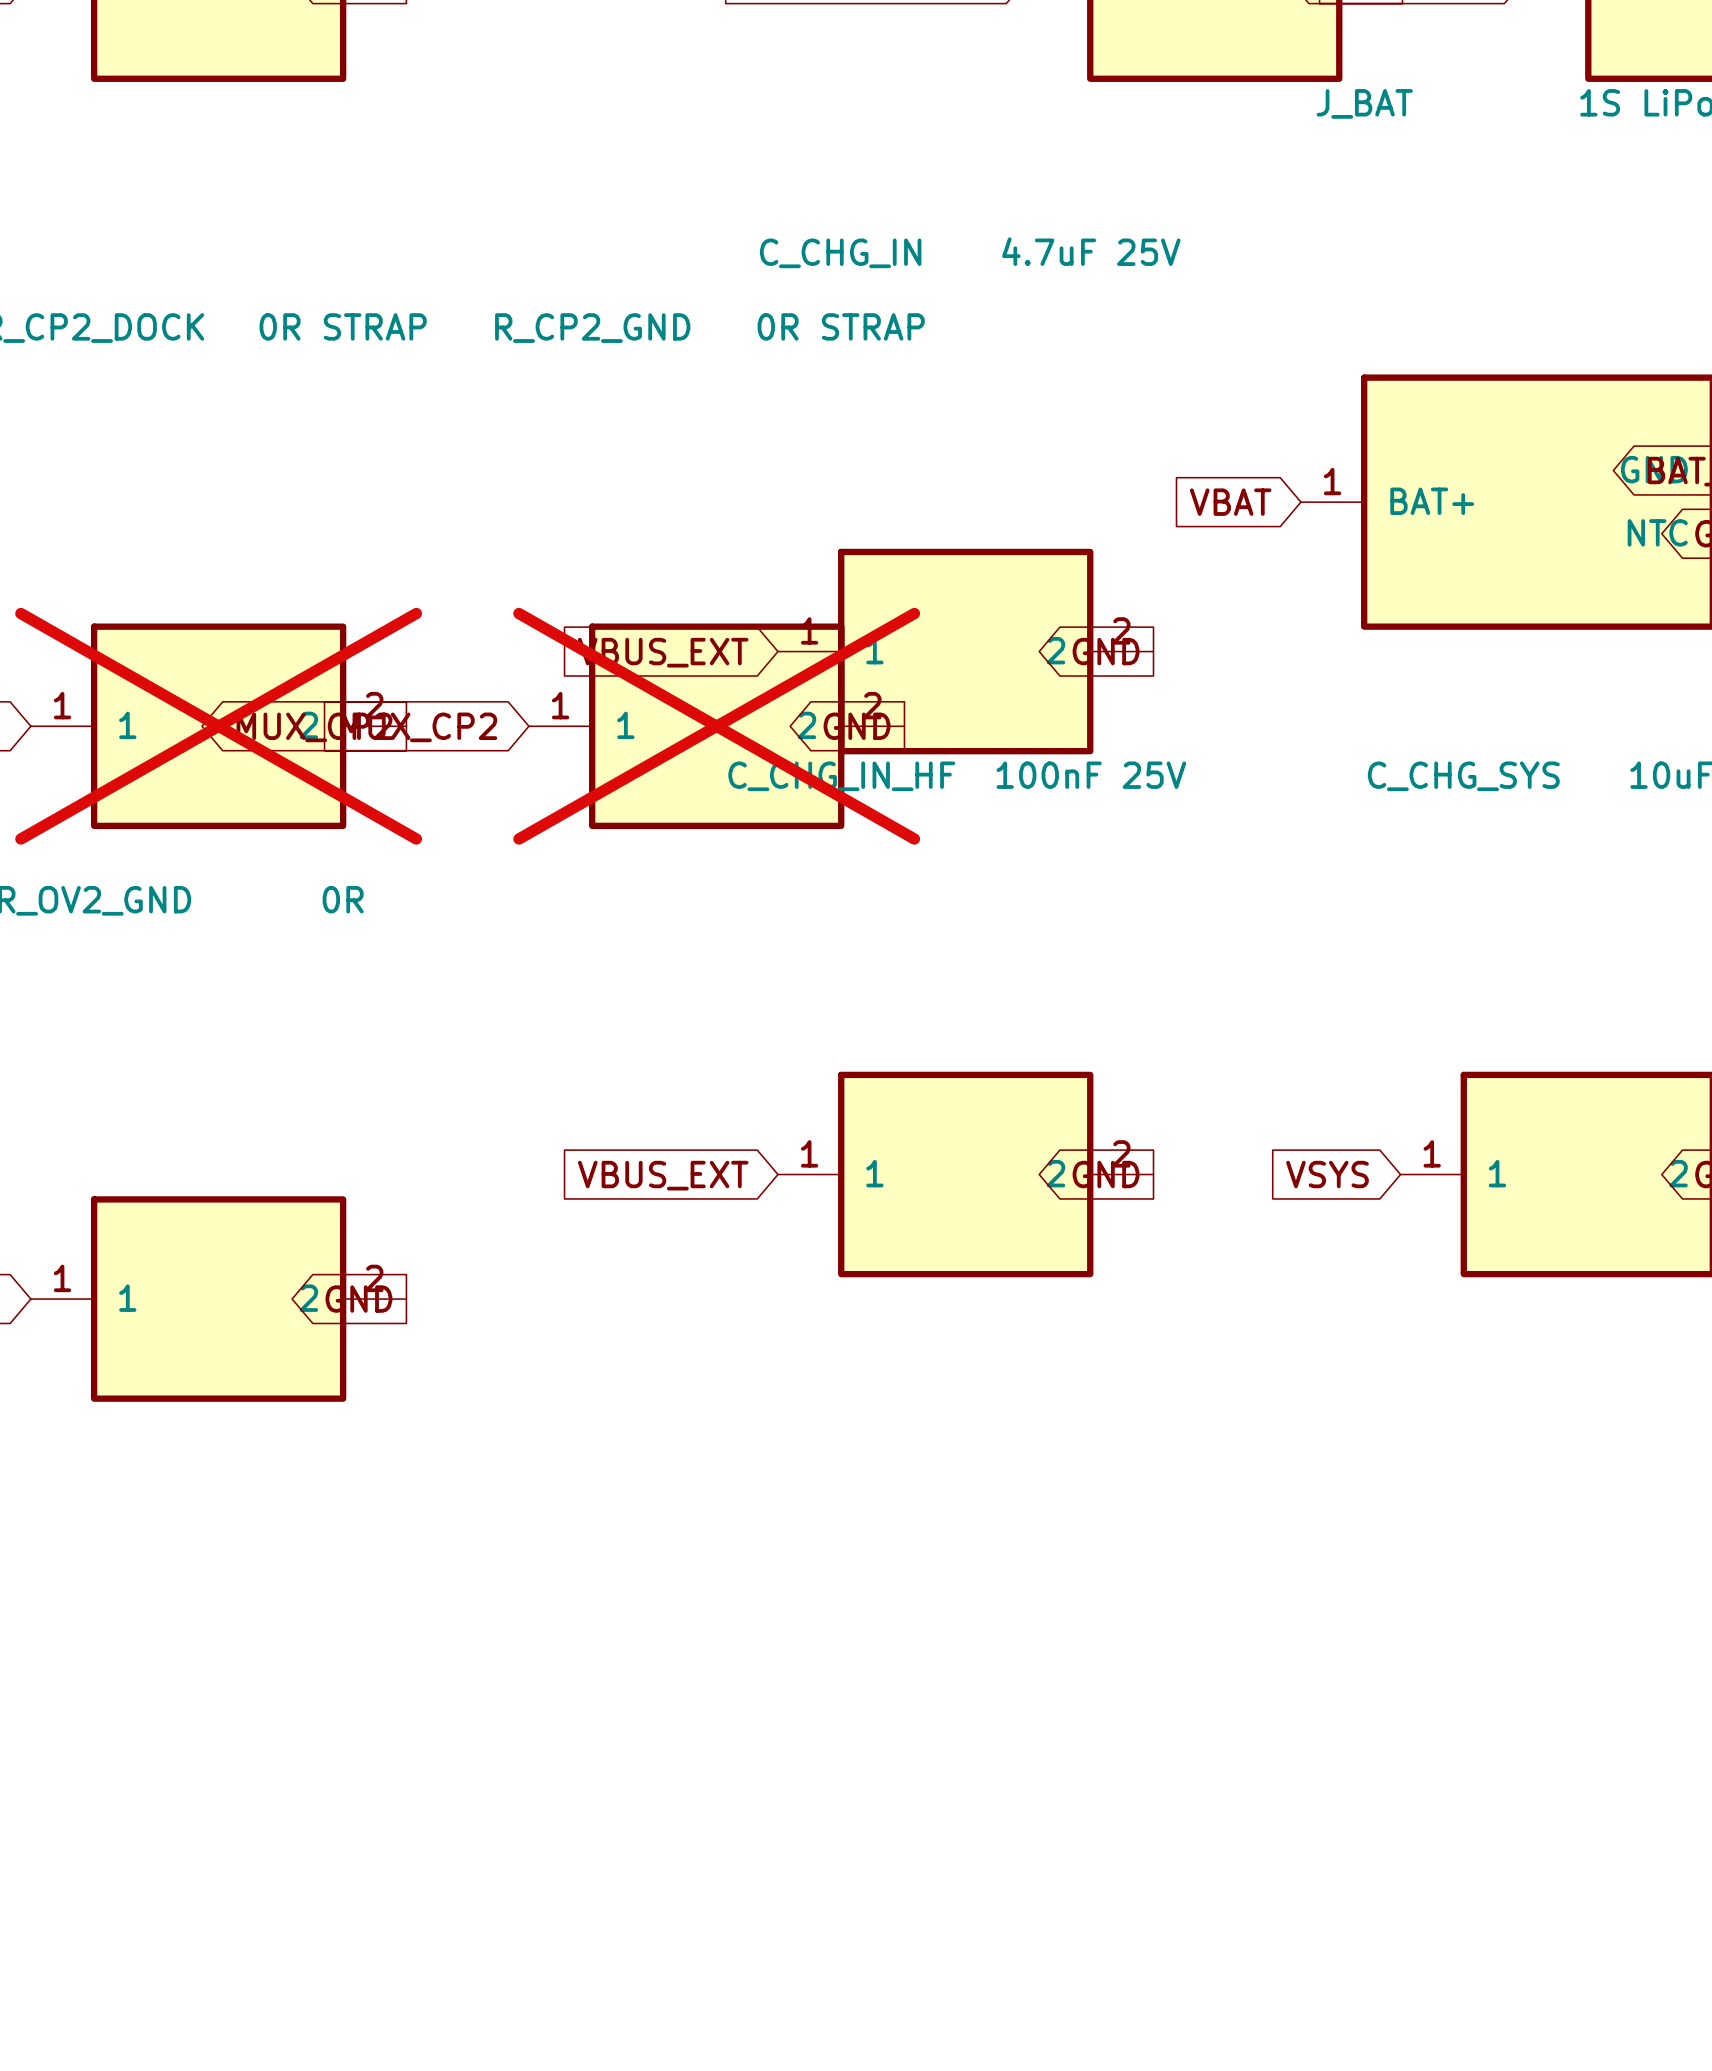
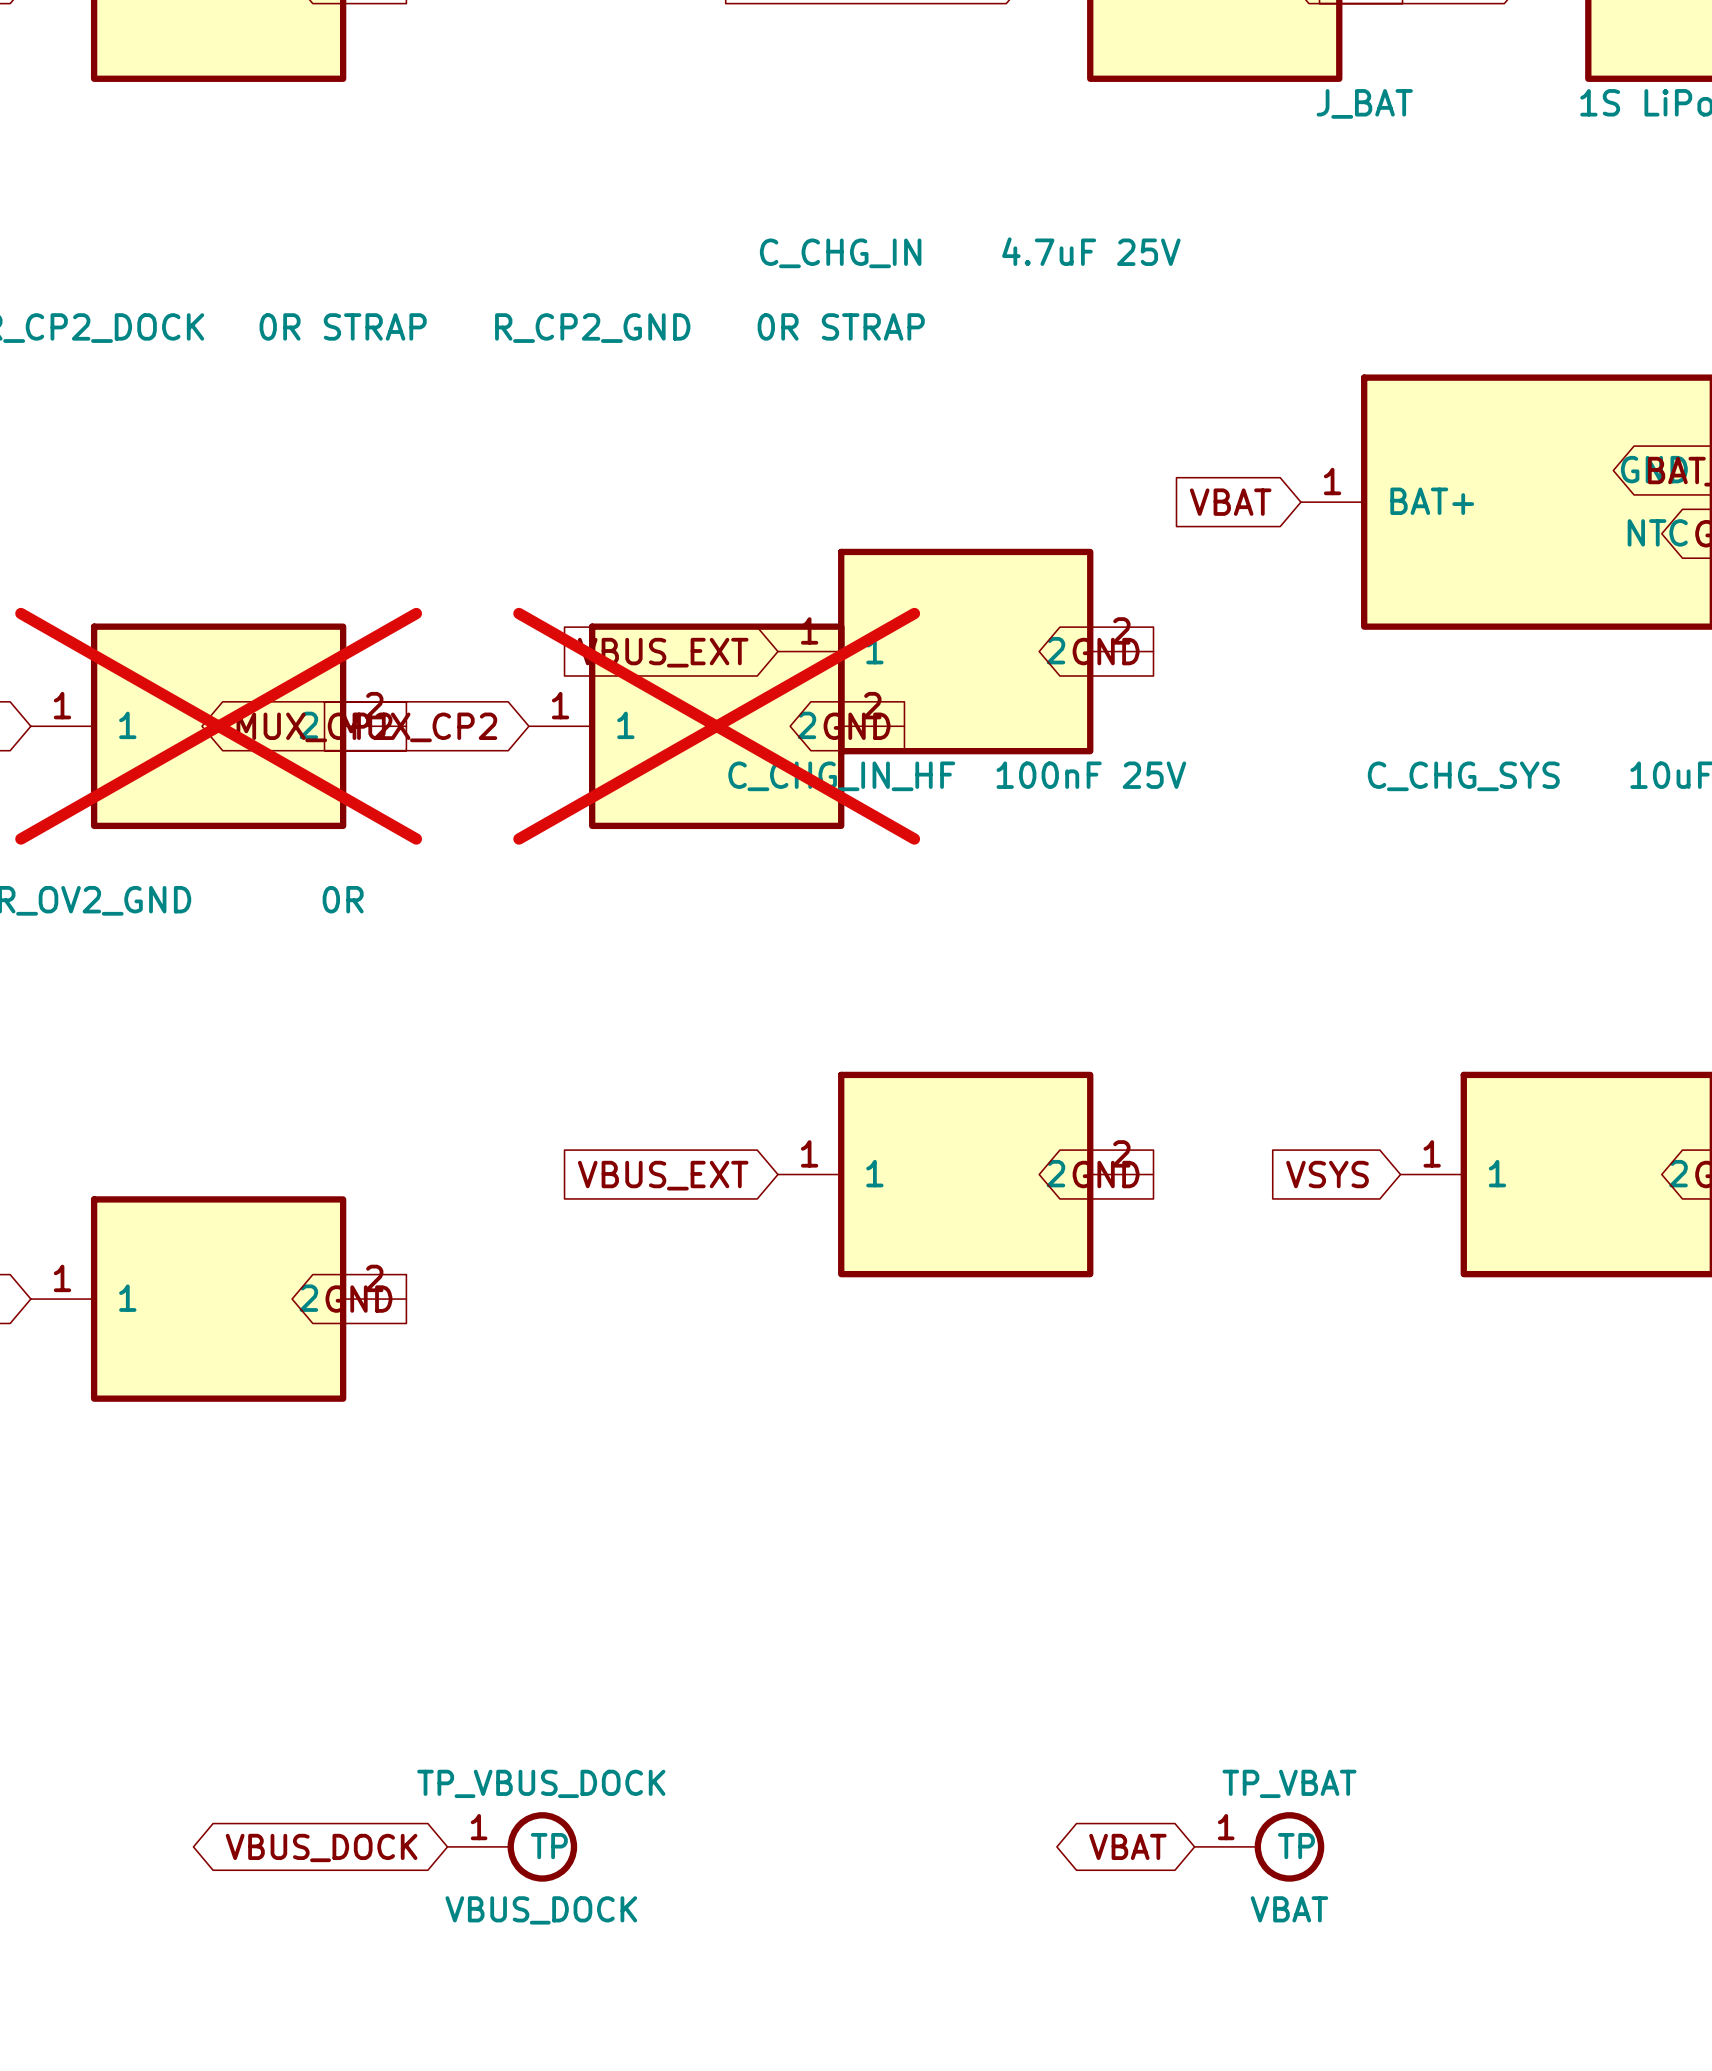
TP_VBUS_DOCK: none -> VBUS_DOCK (512, 1846)
global label: none -> VBAT (1127, 1846)
TP_VBAT: none -> VBAT (1259, 1846)
global label: none -> VBUS_DOCK (321, 1847)

